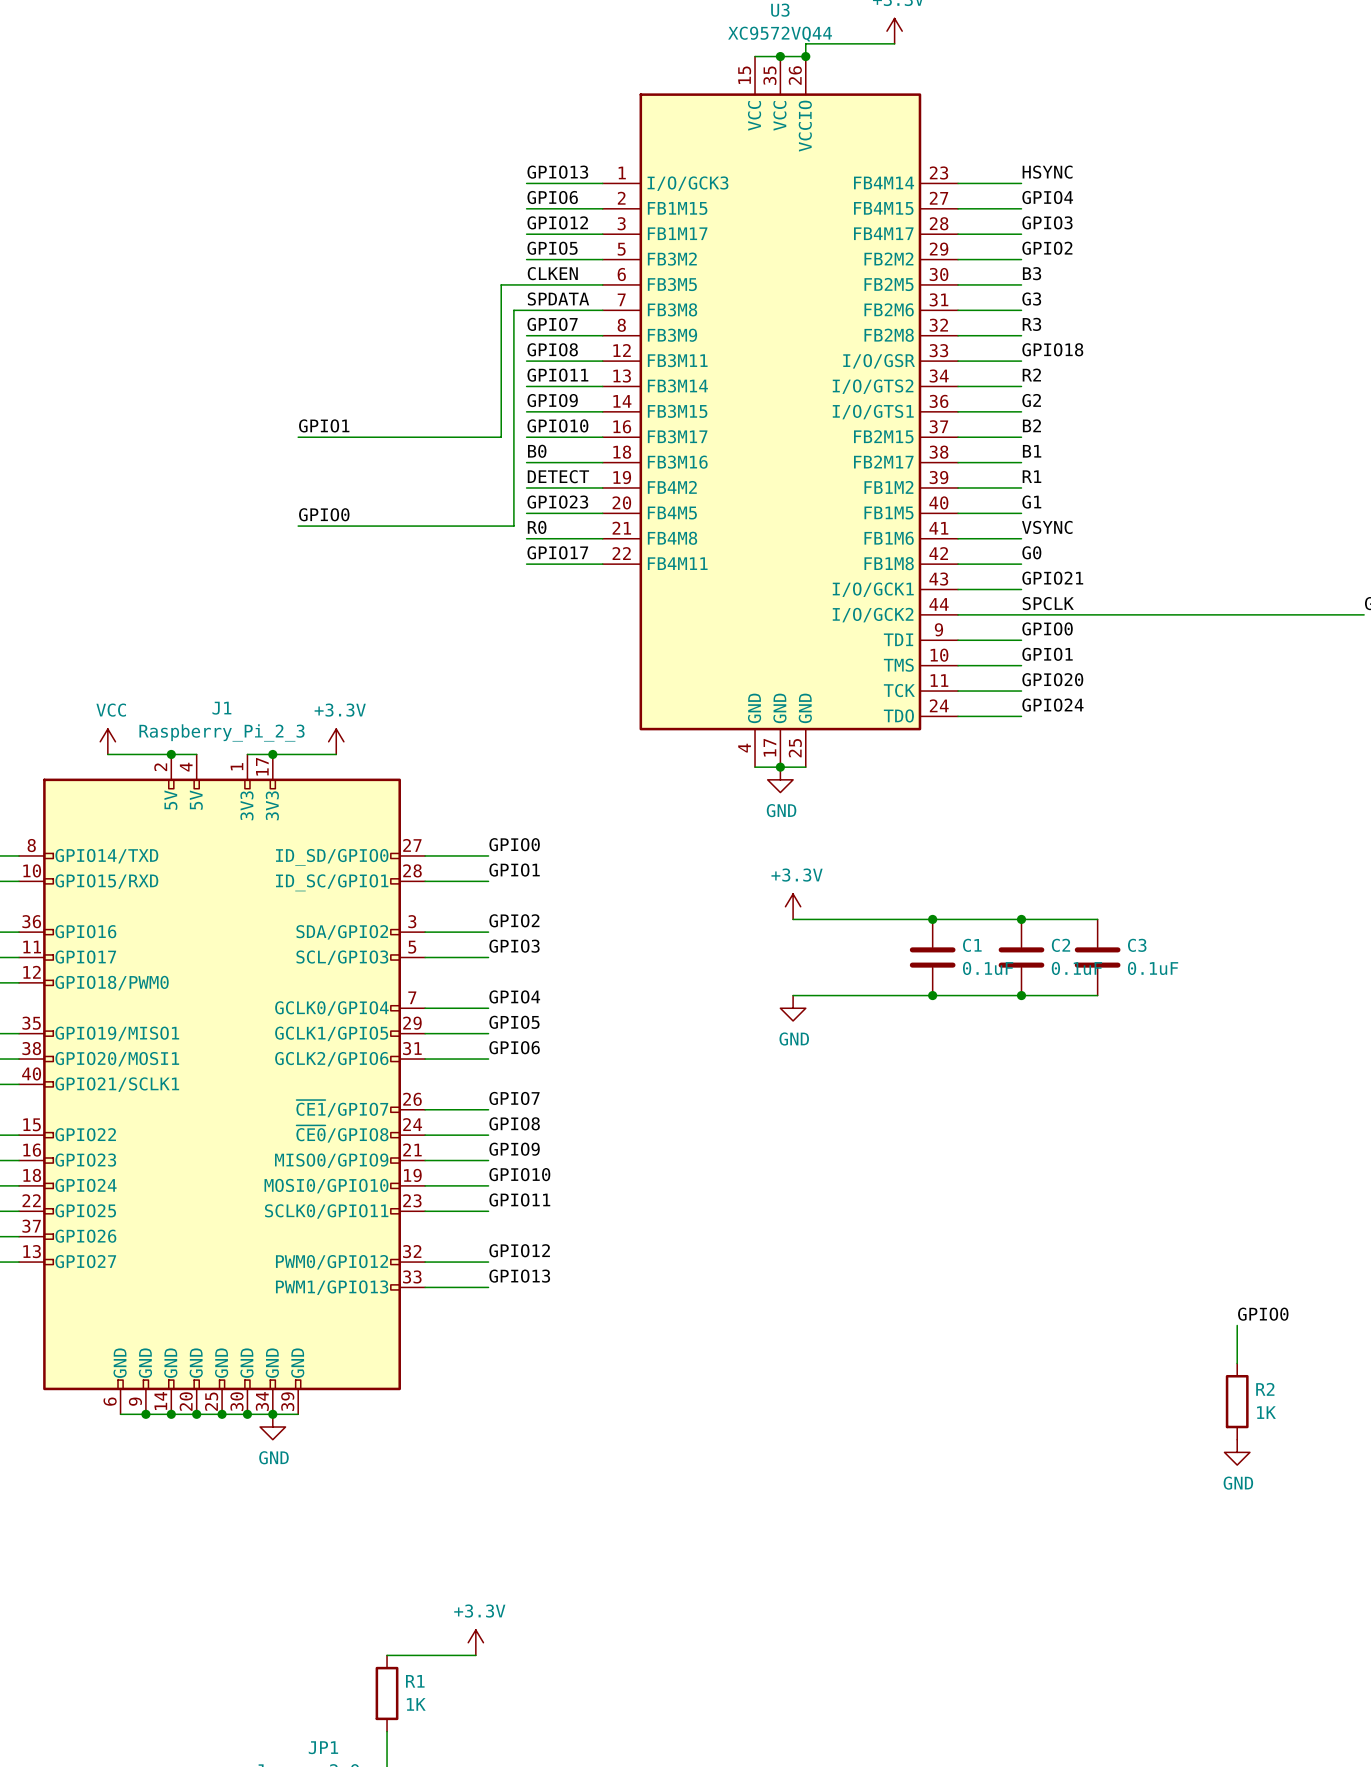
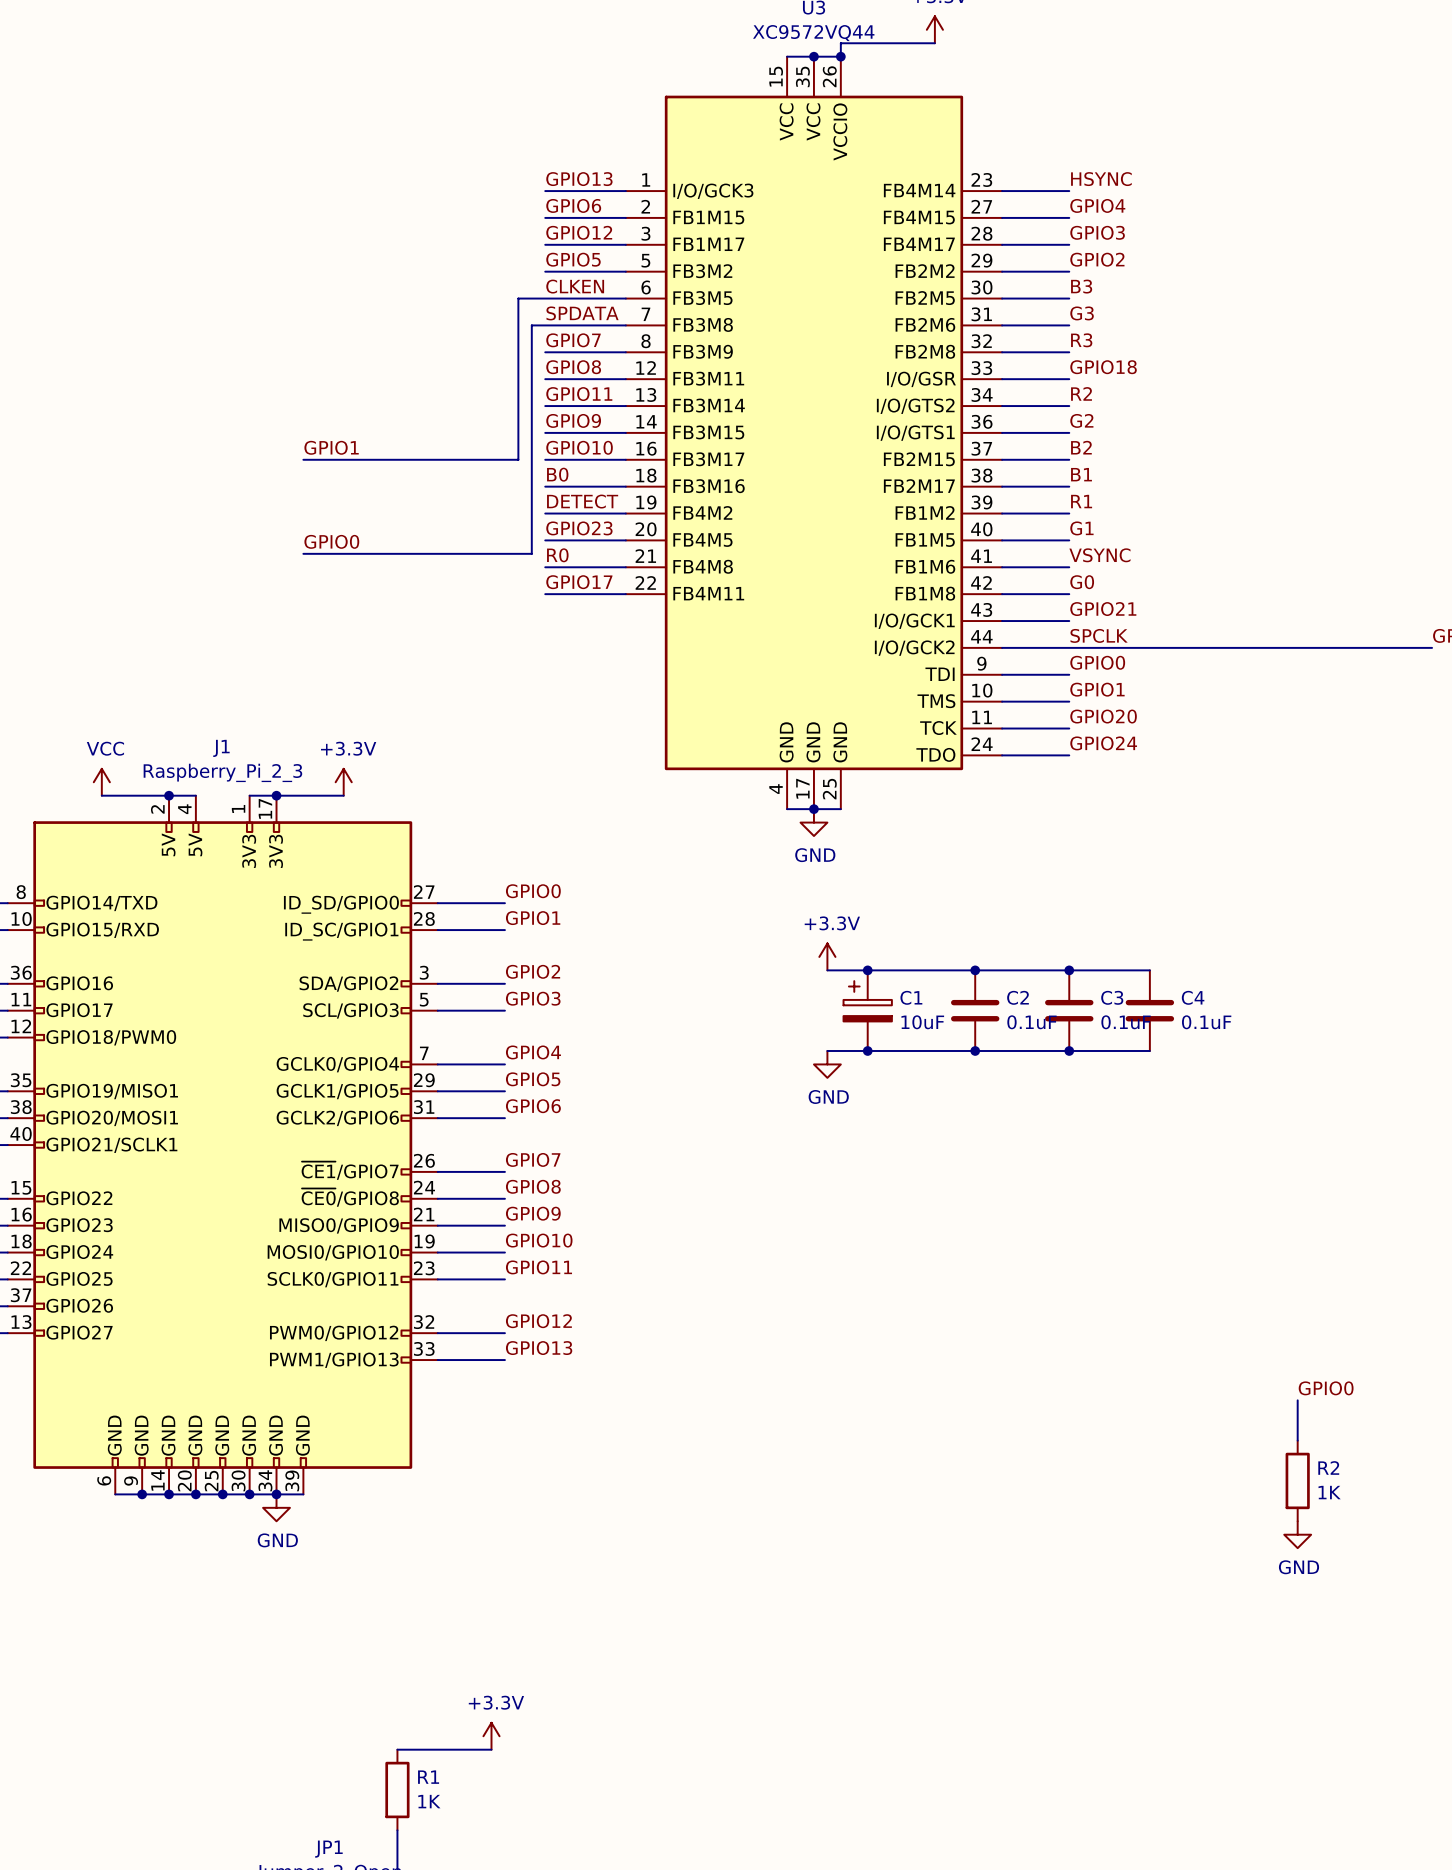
junction: none -> (867, 970)
C1 name: C1 (972, 945) -> C2 (1018, 997)
C2 name: C2 (1061, 945) -> C3 (1112, 997)
C3 name: C3 (1137, 945) -> C4 (1193, 997)
C1: none -> 10uF (867, 1010)
junction: none -> (867, 1050)

